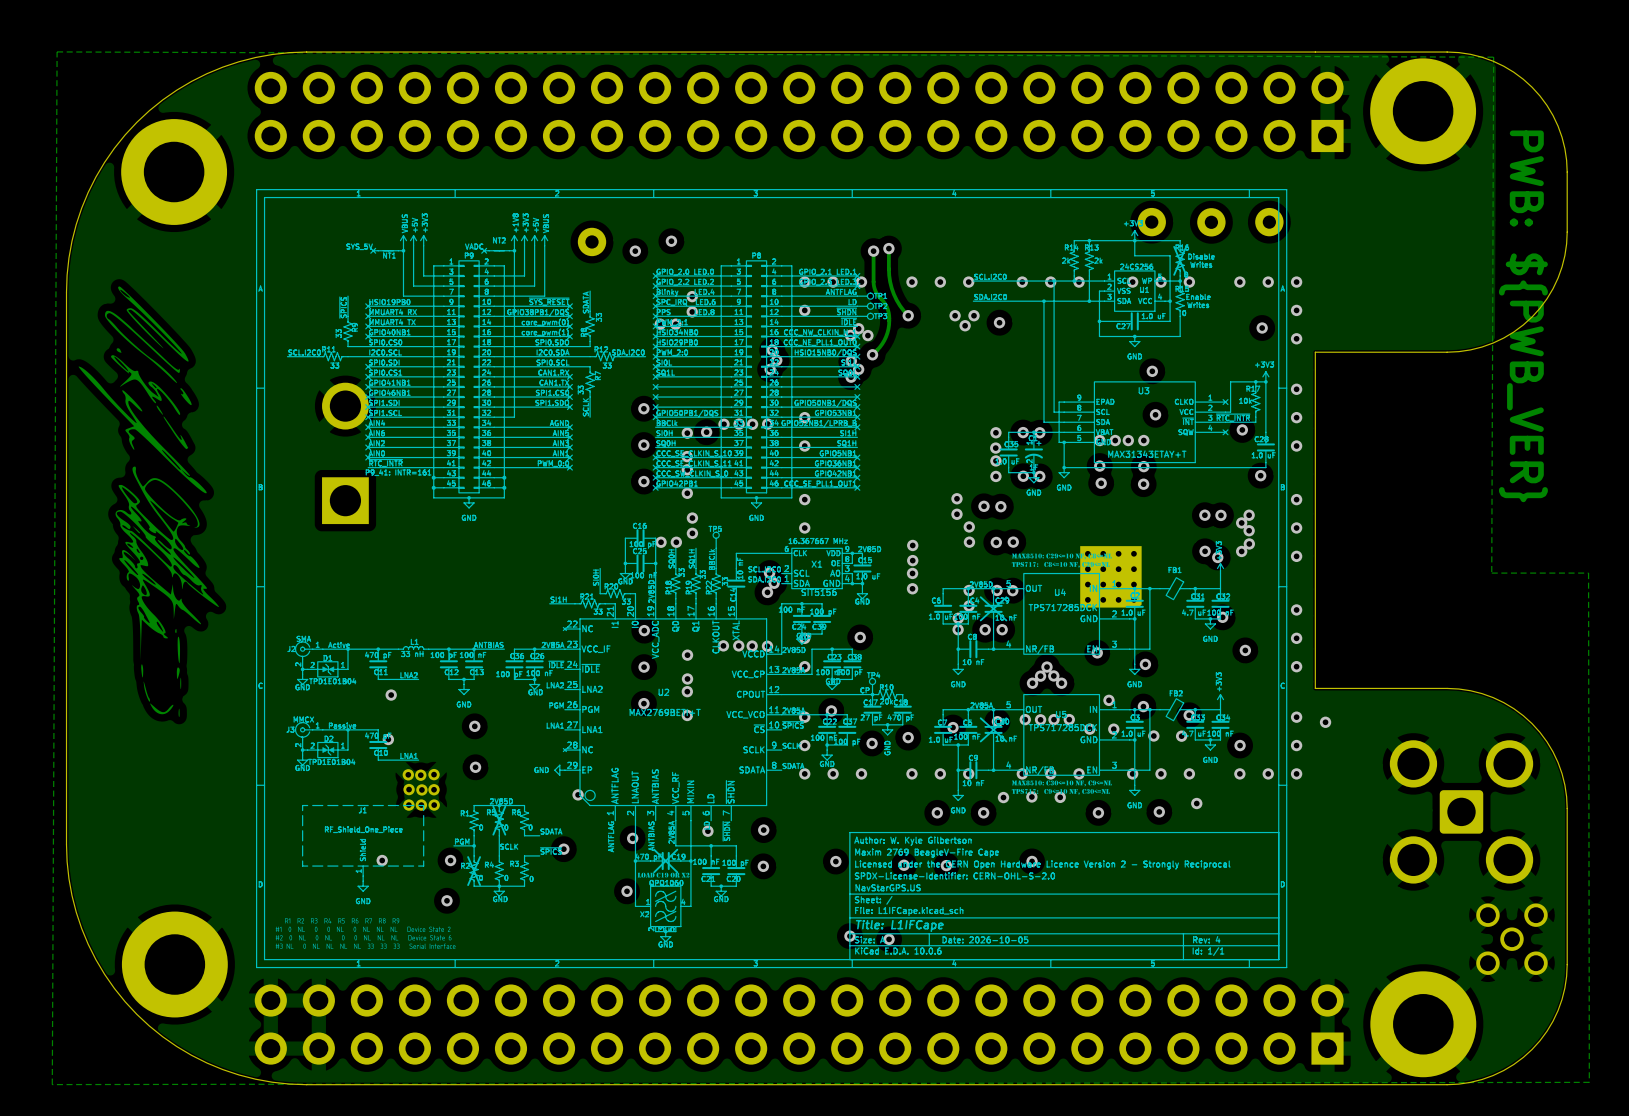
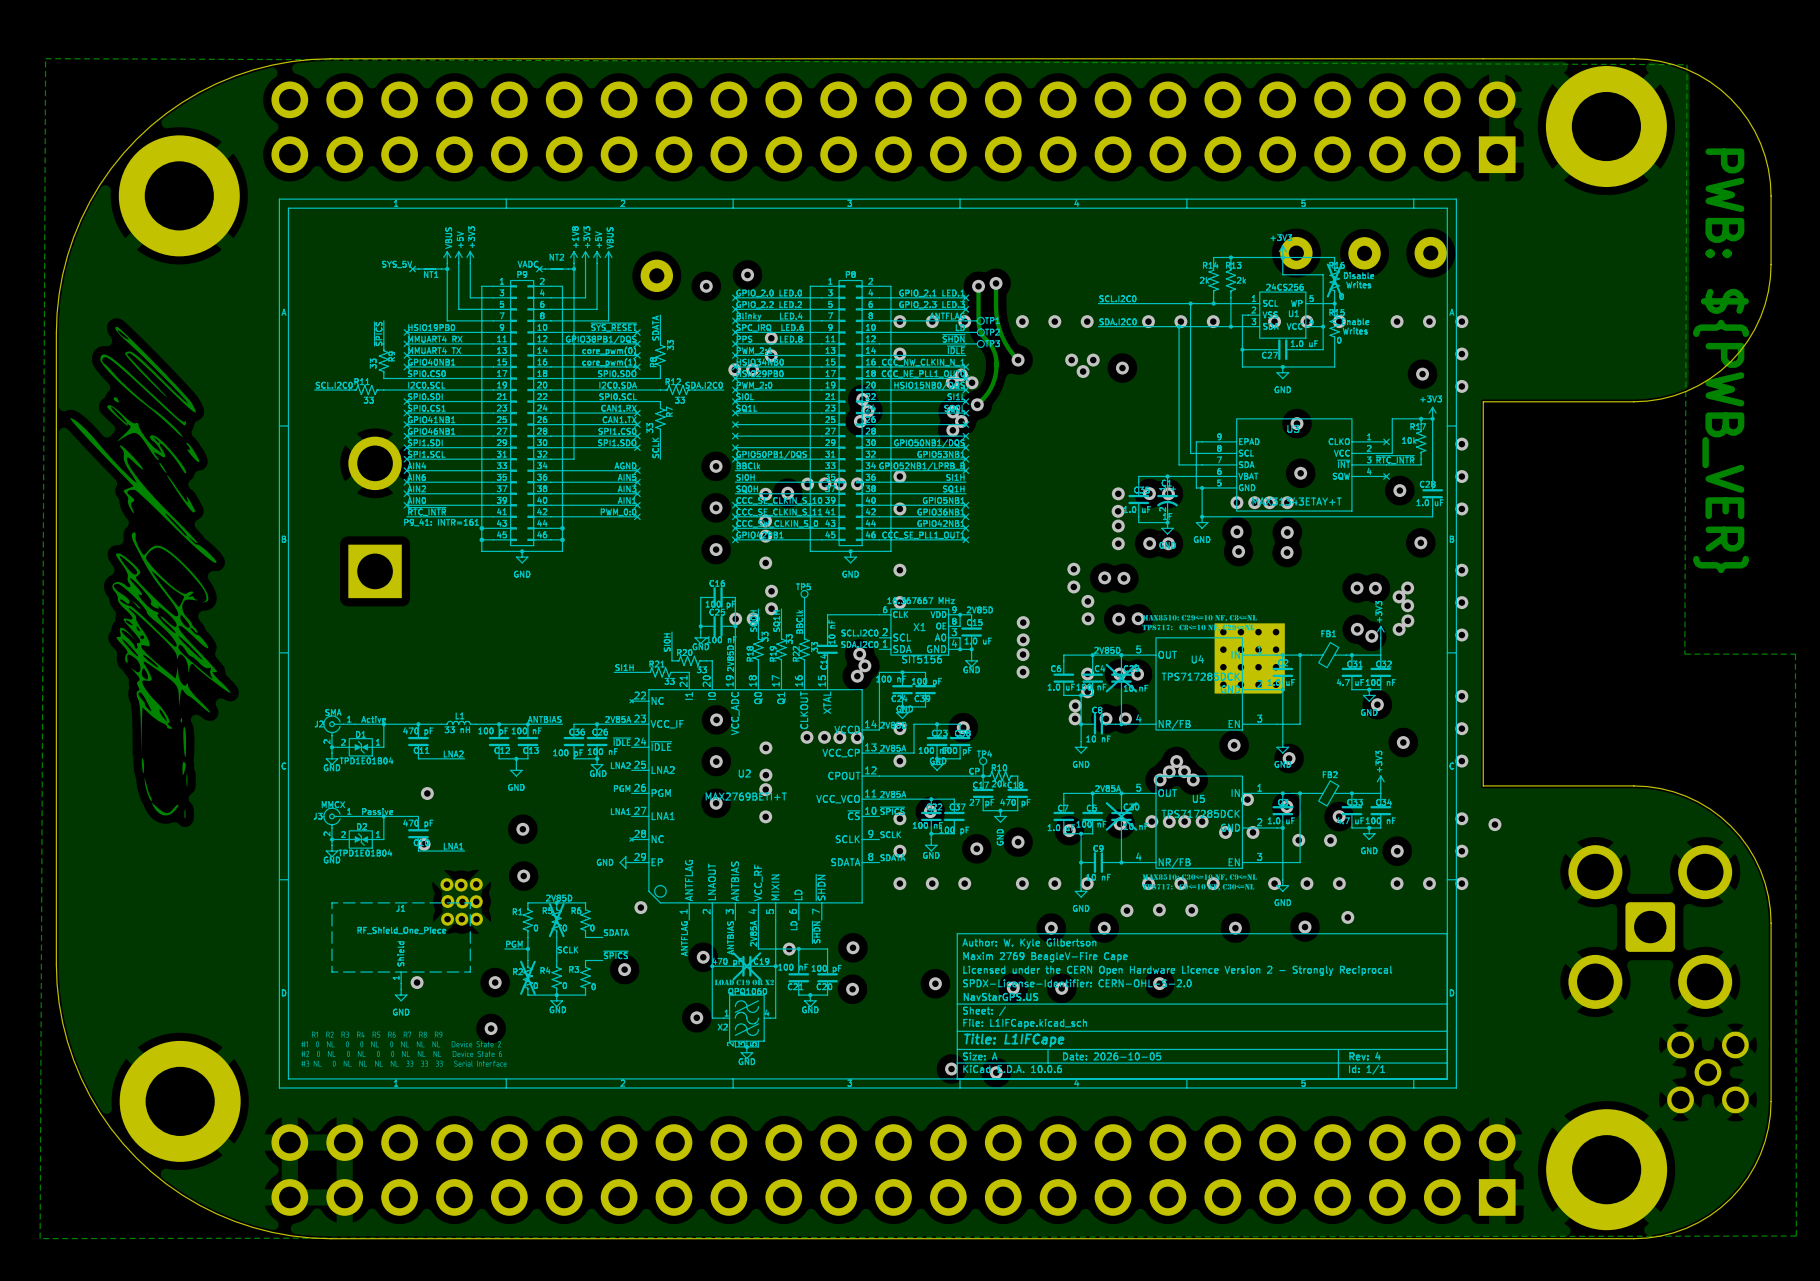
drawing position: (771, 578) -> (867, 643)

